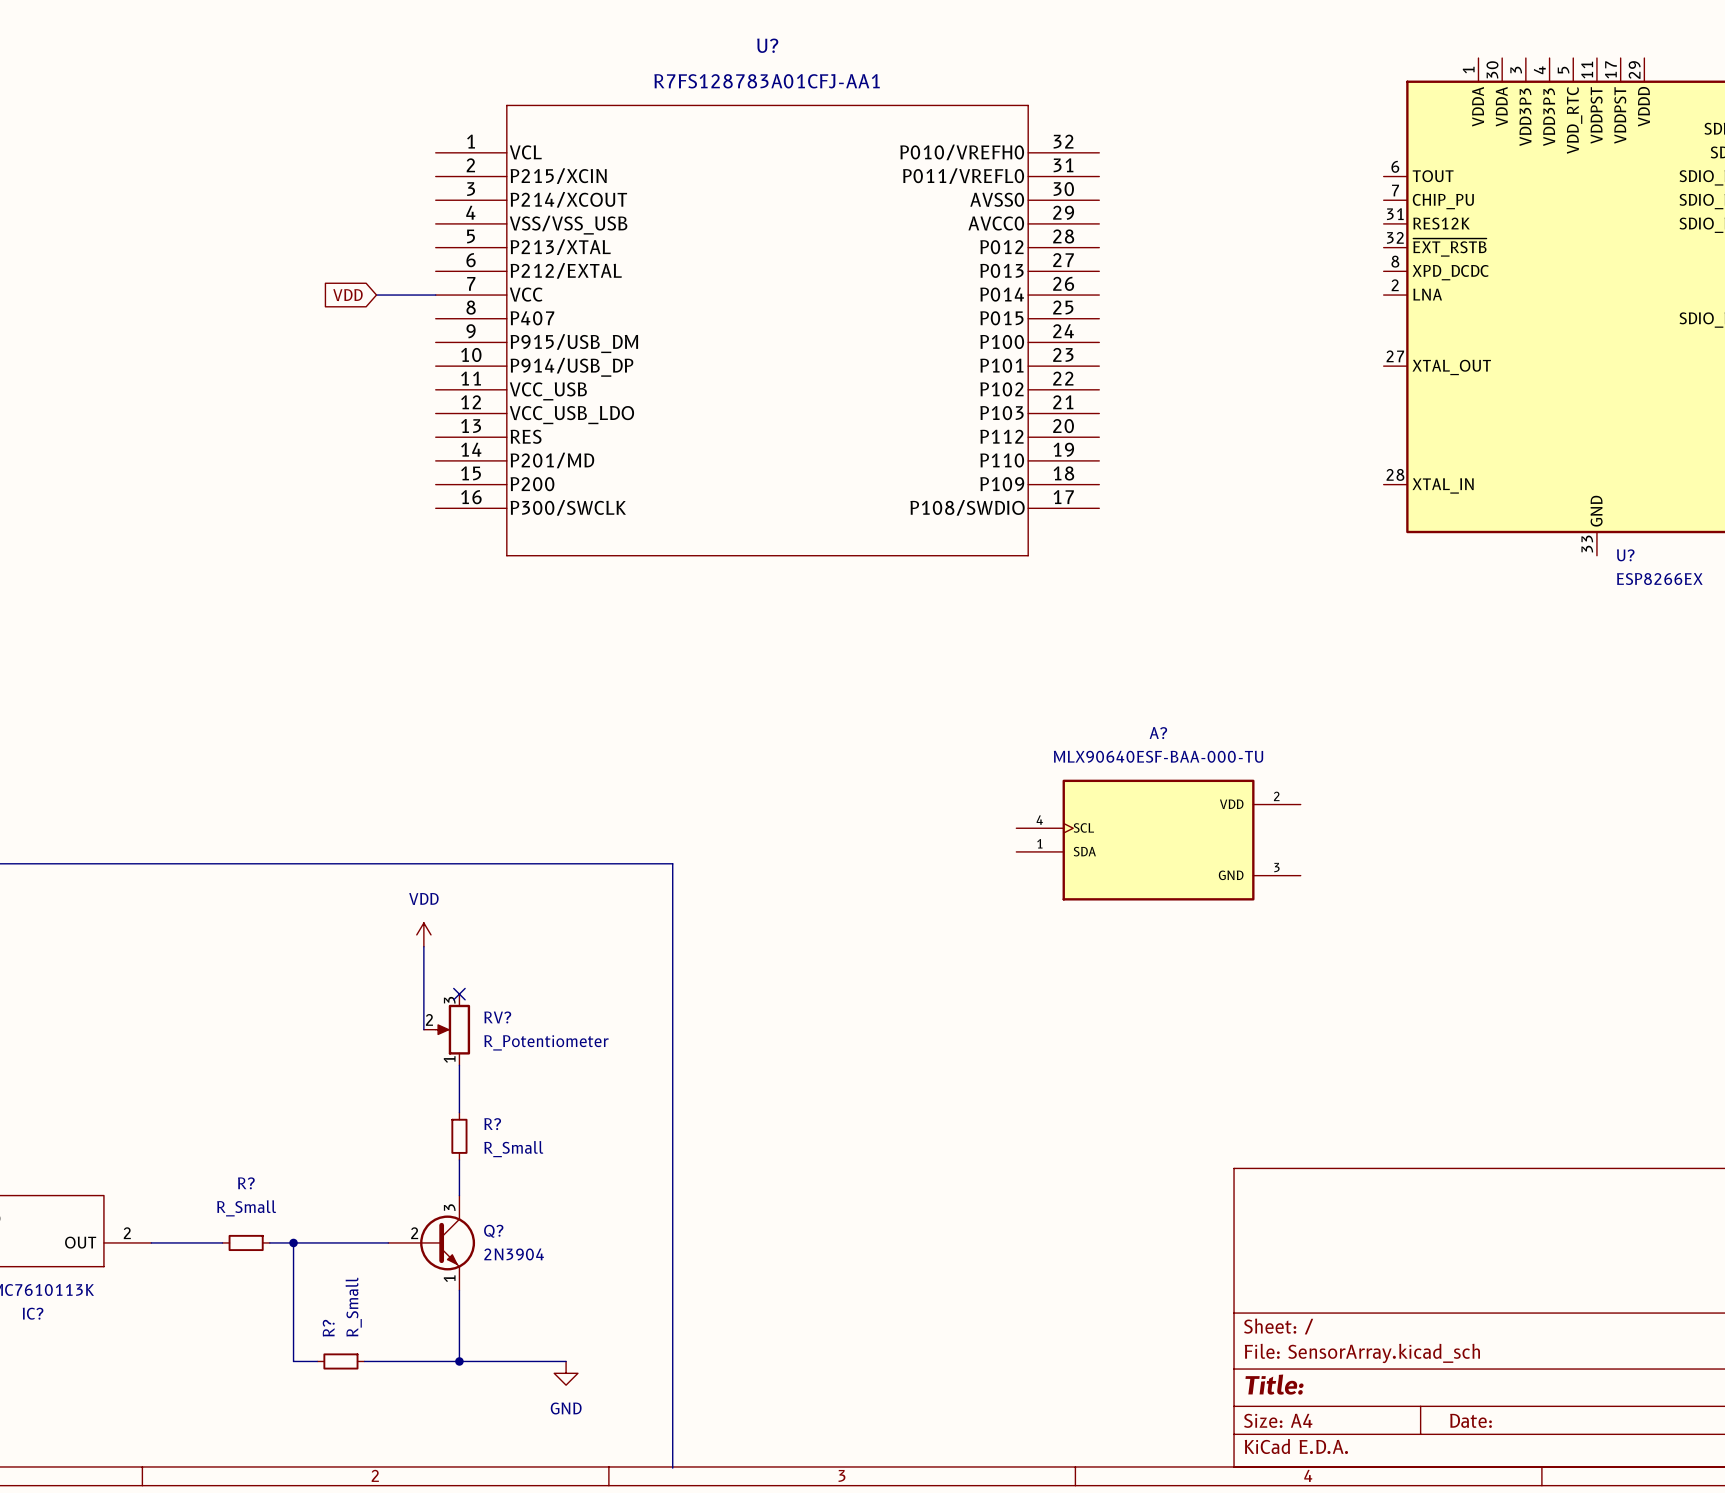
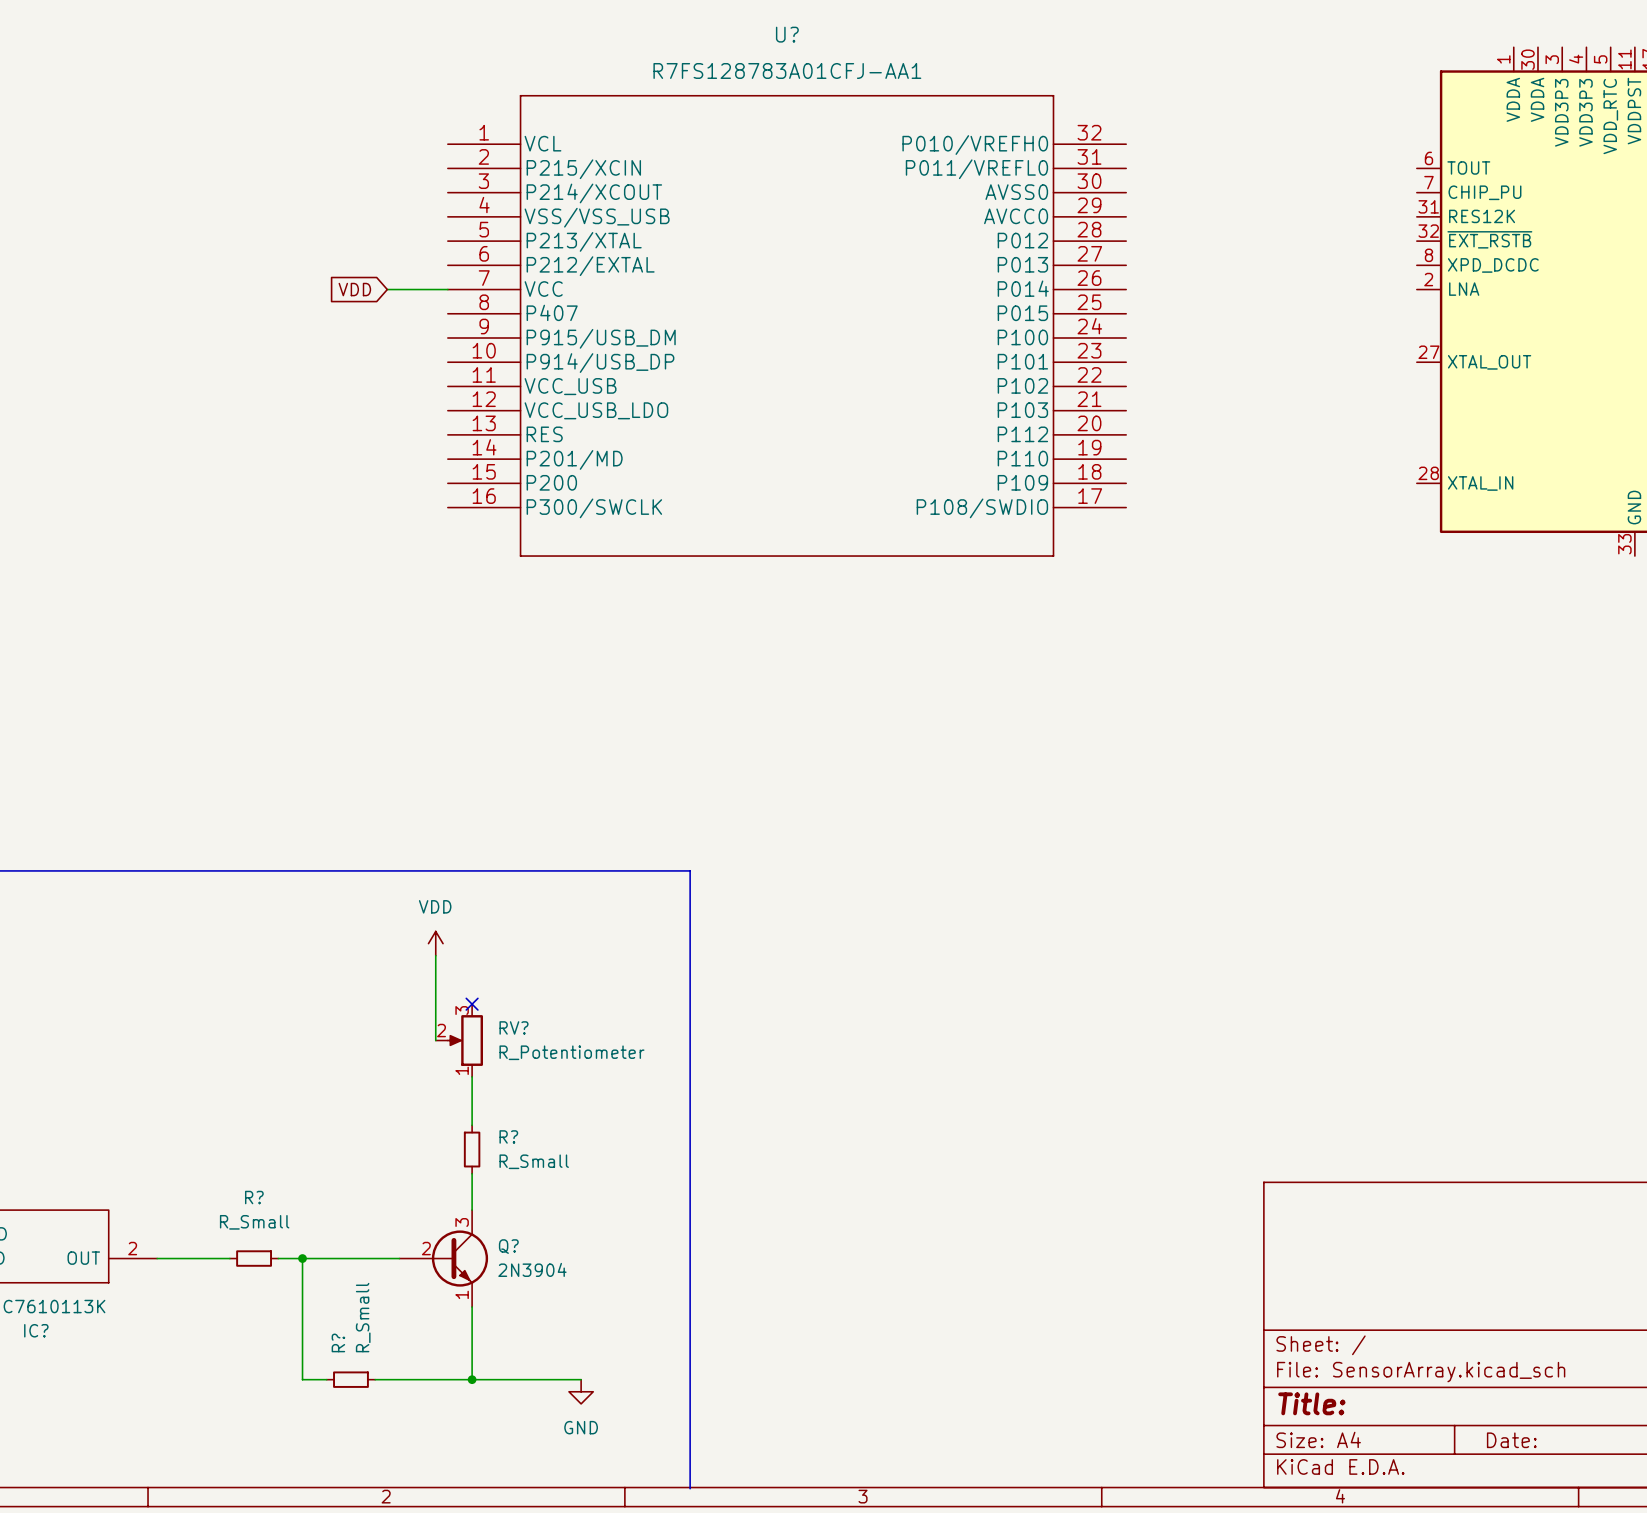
A?: MLX90640ESF-BAA-000-TU (1158, 840) -> none

